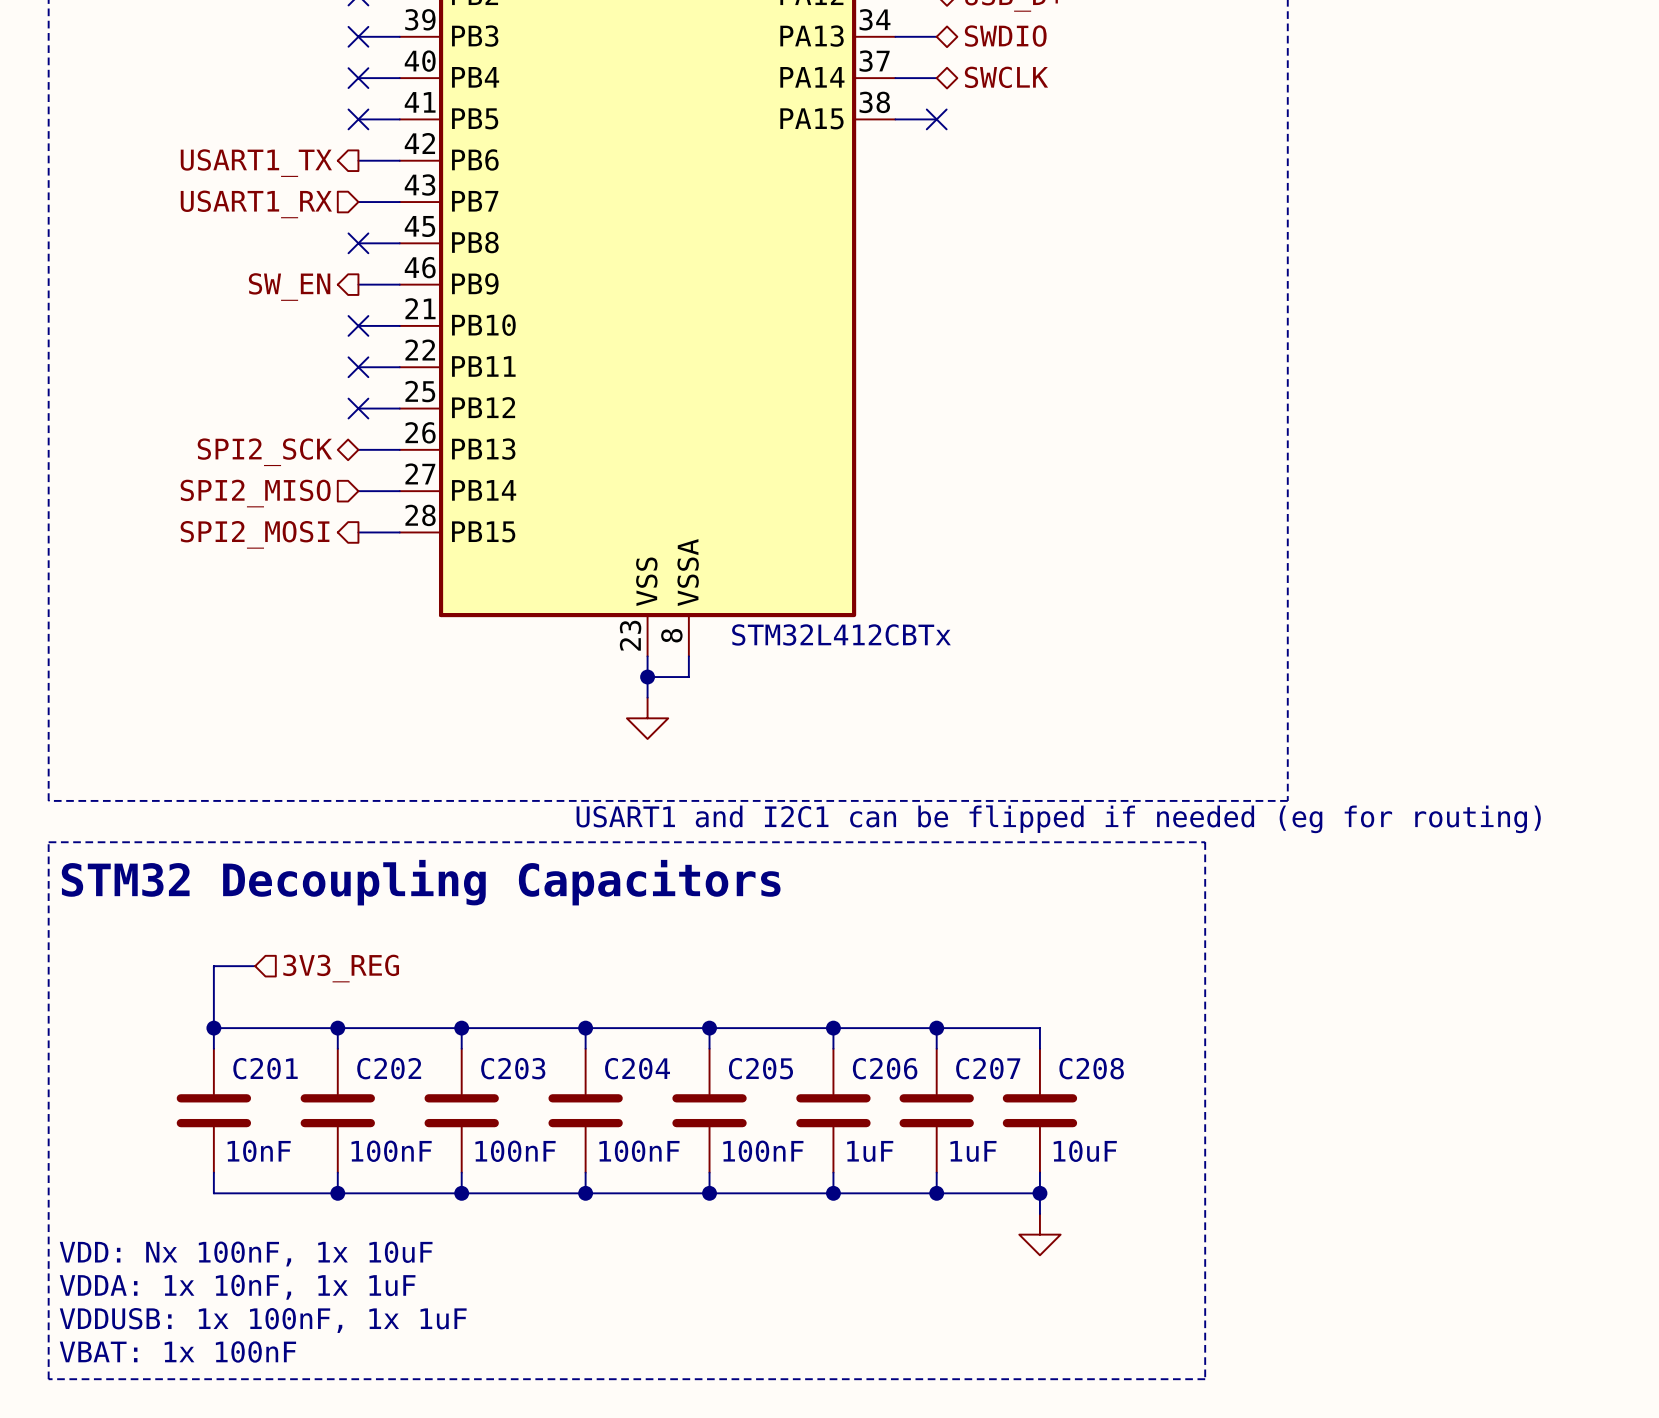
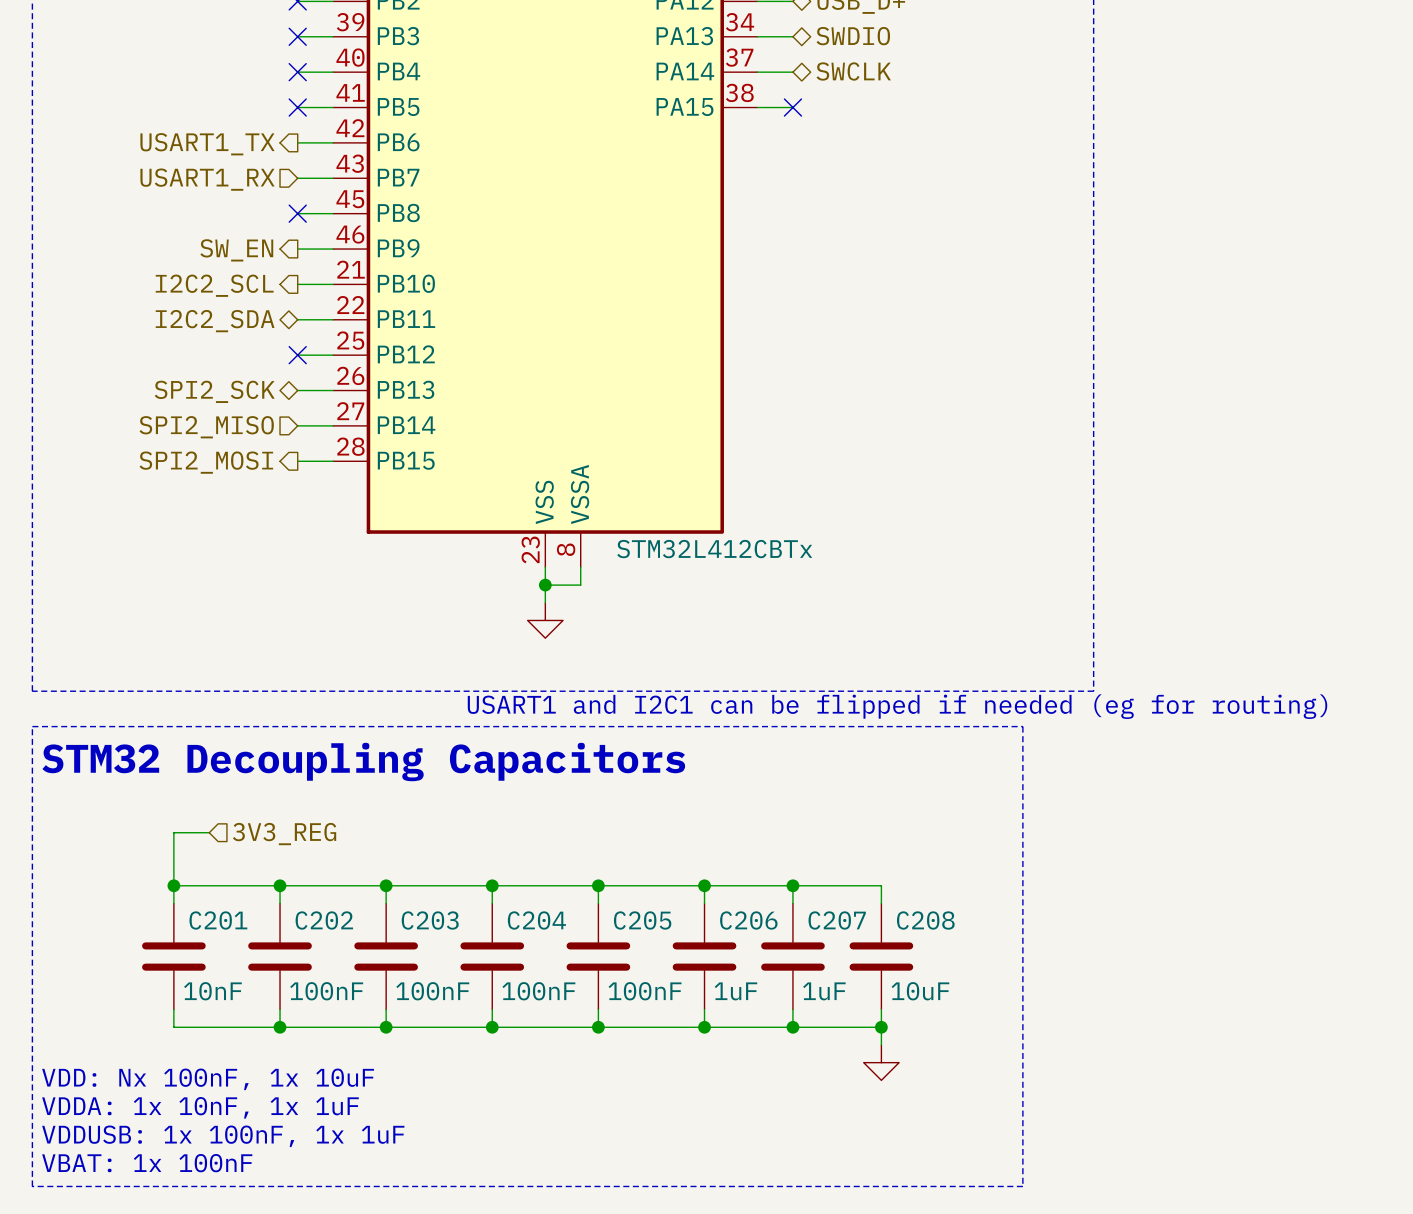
no-connect mark: (358, 325) -> none
hierarchical label: none -> I2C2_SCL (214, 285)
no-connect mark: (358, 367) -> none
hierarchical label: none -> I2C2_SDA (215, 321)

